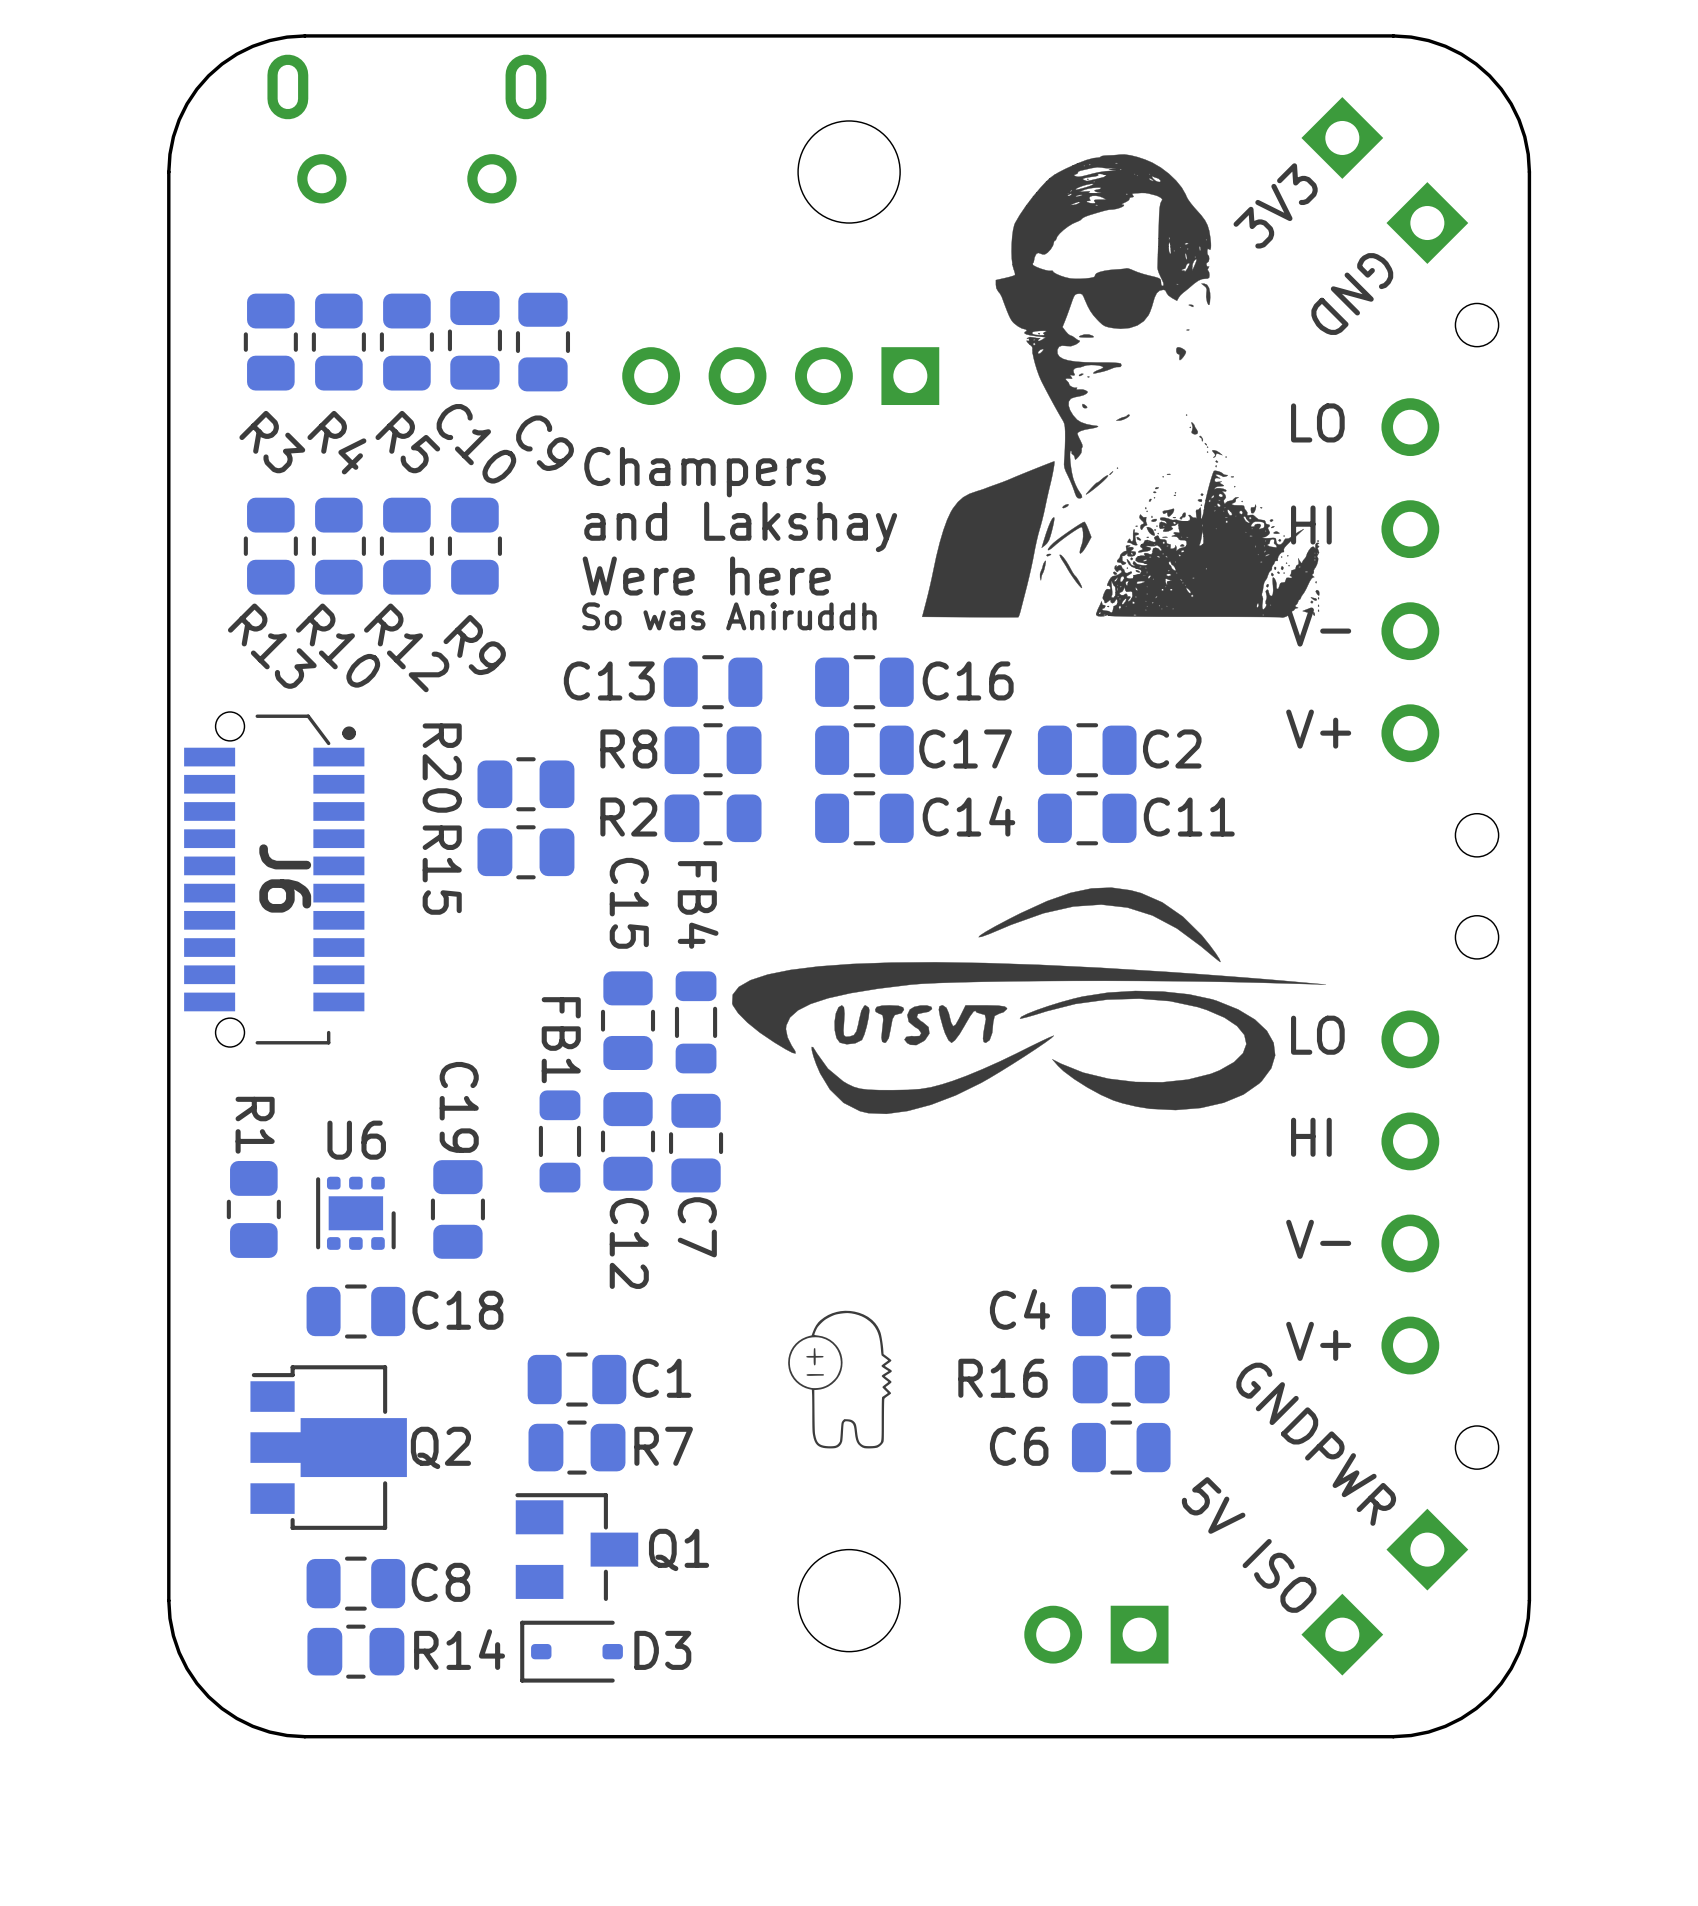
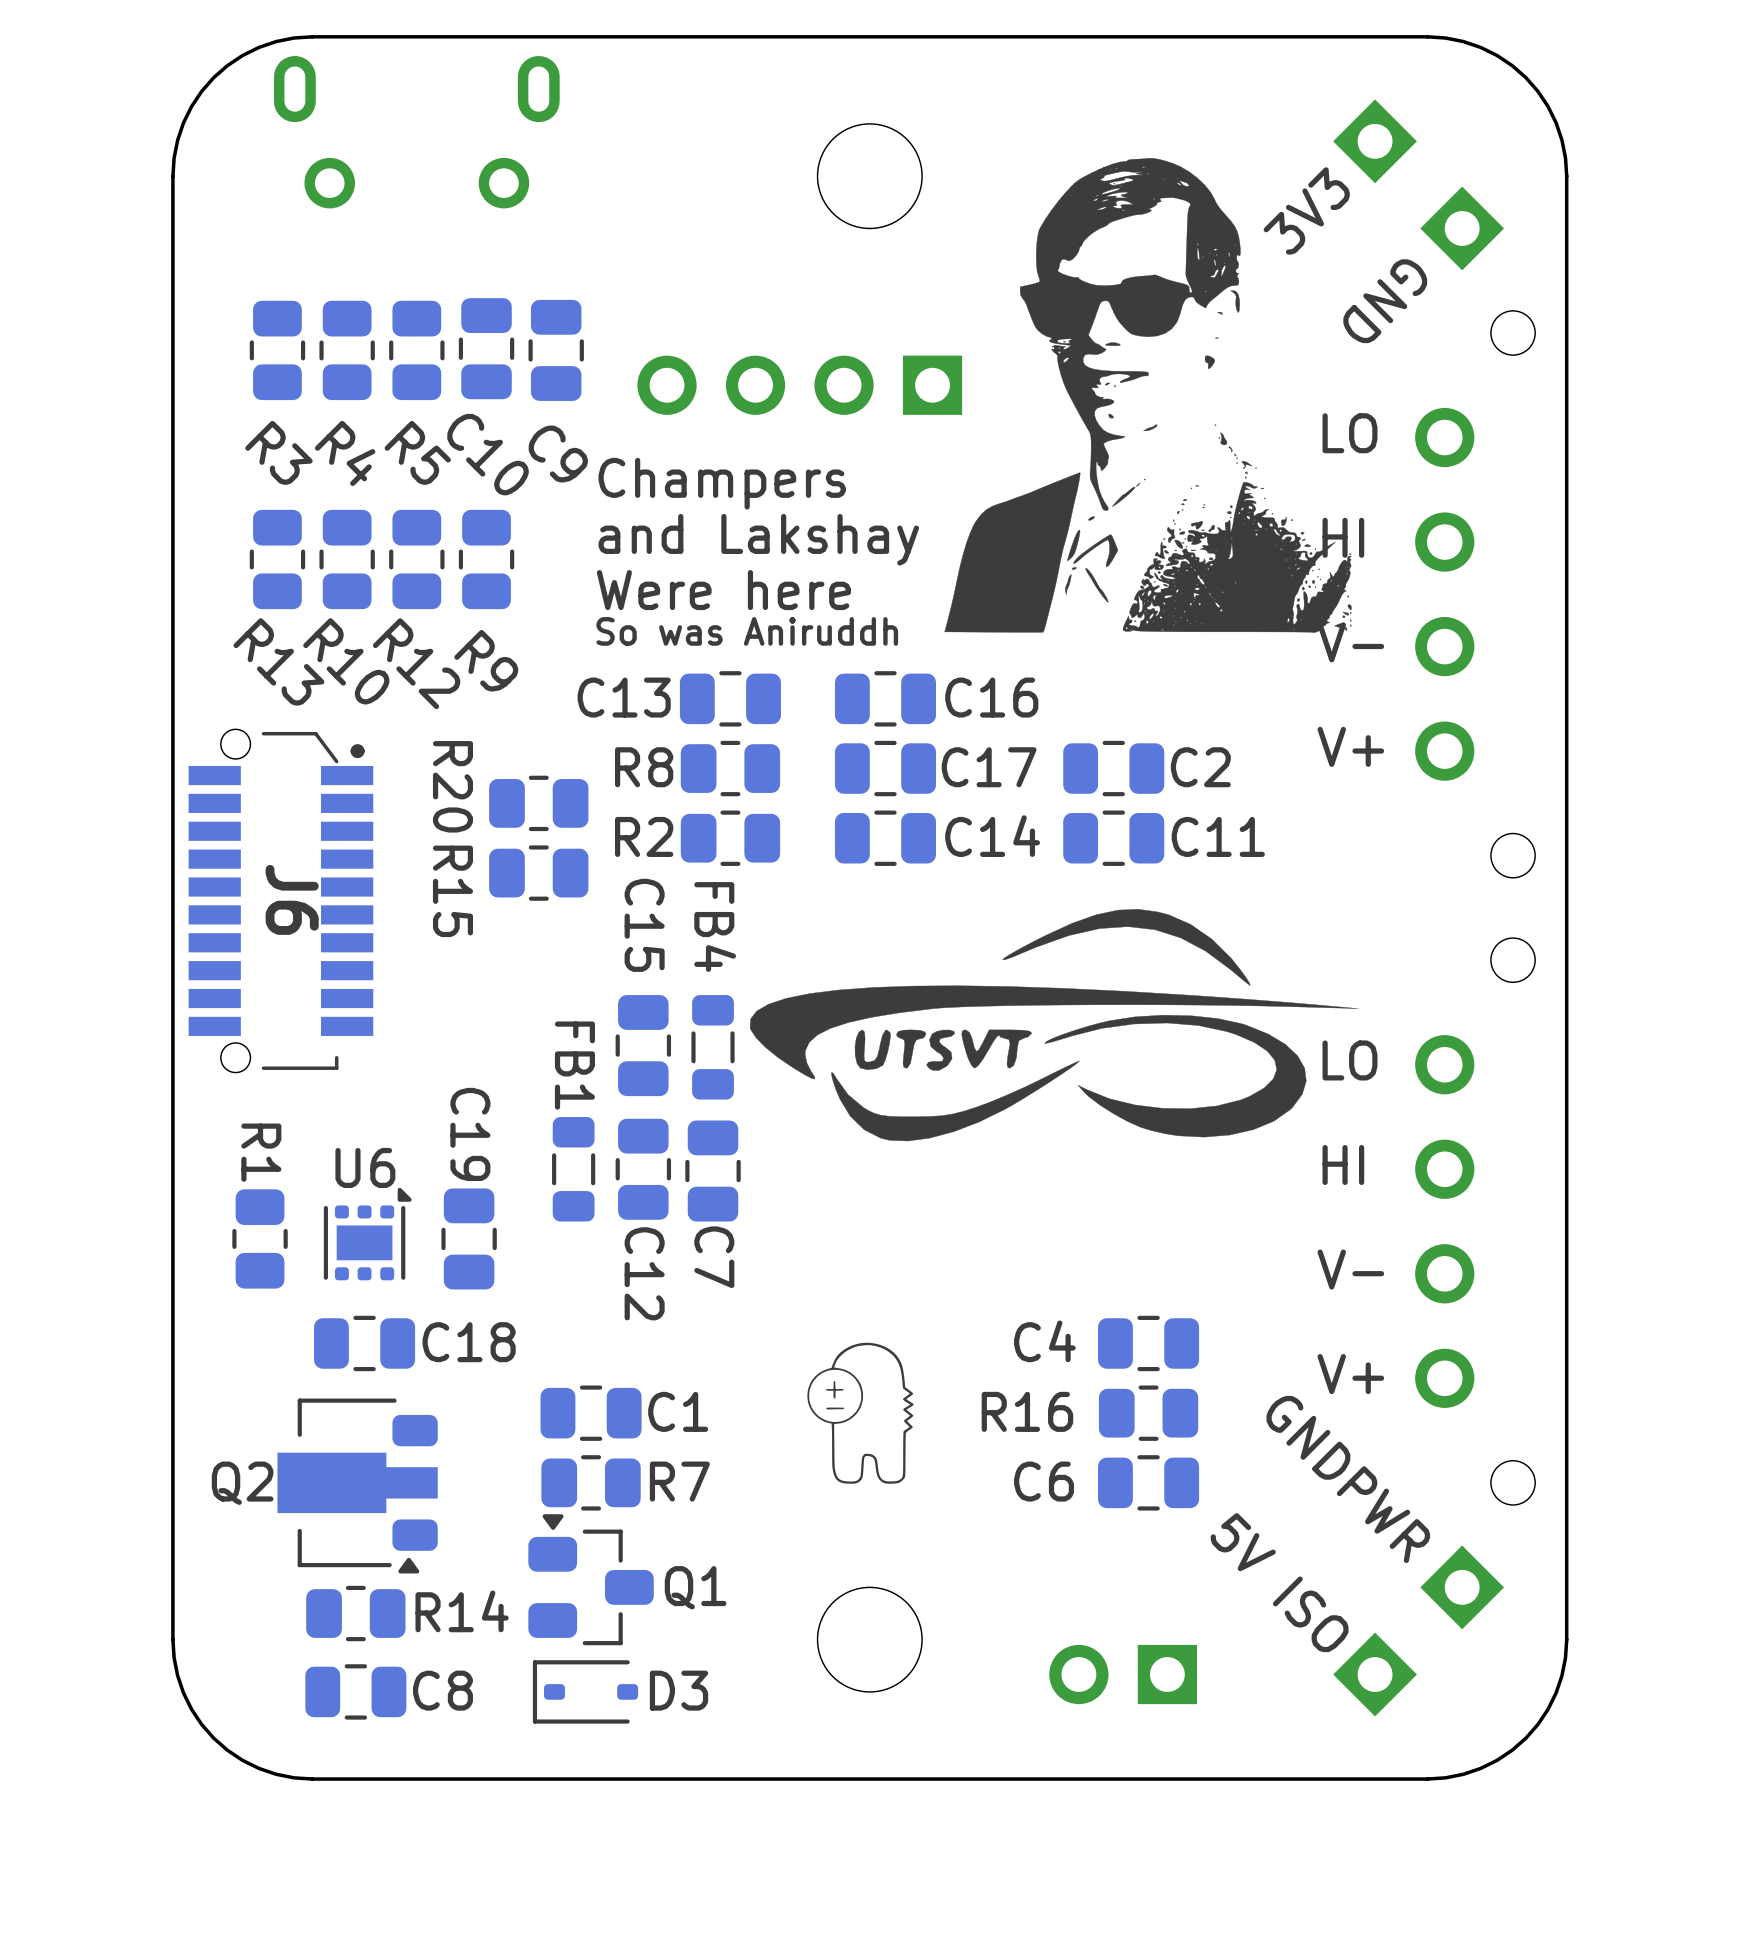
U6 footprint: [316, 1176, 396, 1250] -> [323, 1187, 412, 1281]
Q2 footprint: [250, 1365, 407, 1530] -> [277, 1398, 438, 1574]
Q2 name position: Q2 (440, 1447) -> Q2 (242, 1483)
Q1 footprint: [515, 1493, 639, 1601] -> [528, 1514, 654, 1646]
C8 position: (355, 1583) -> (355, 1691)
R14 position: (355, 1651) -> (355, 1613)

